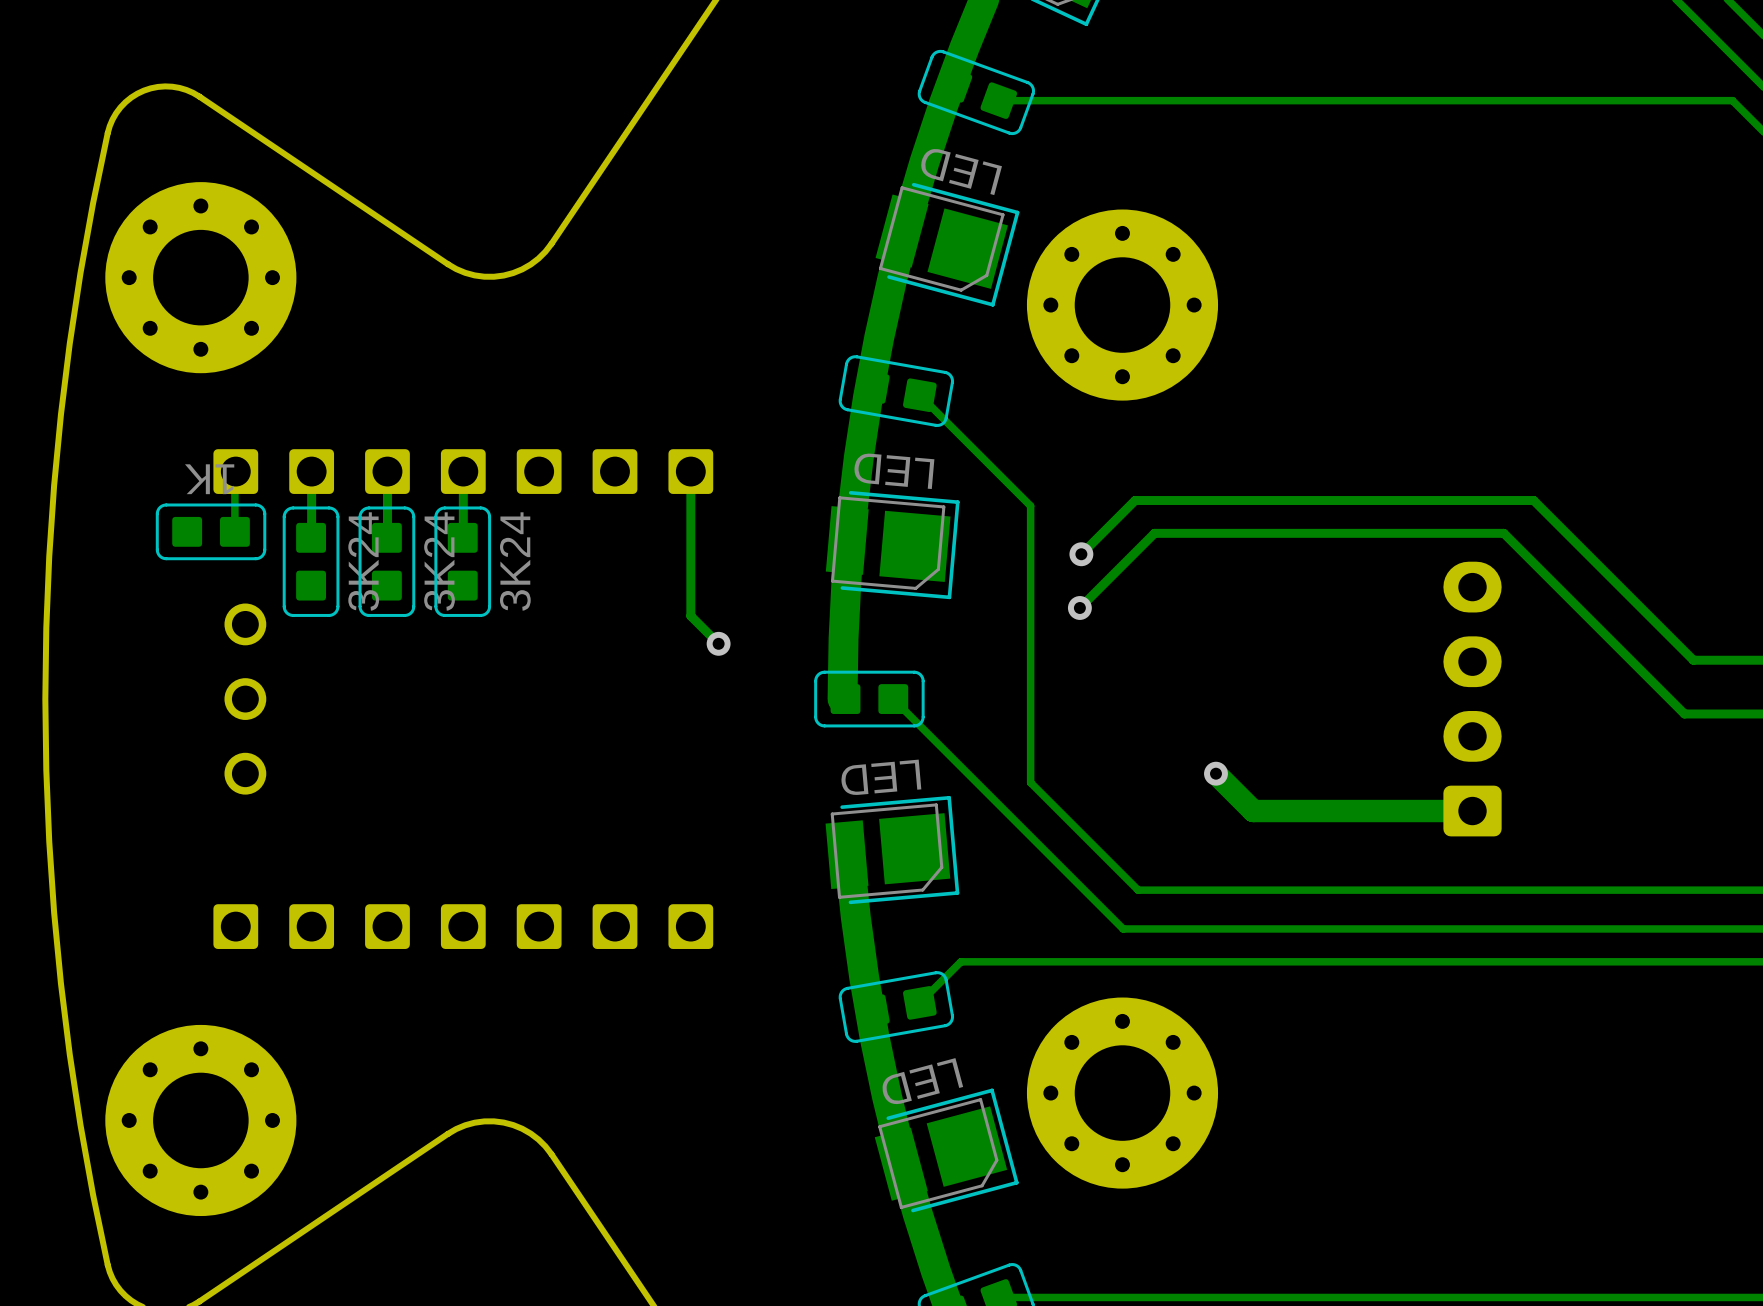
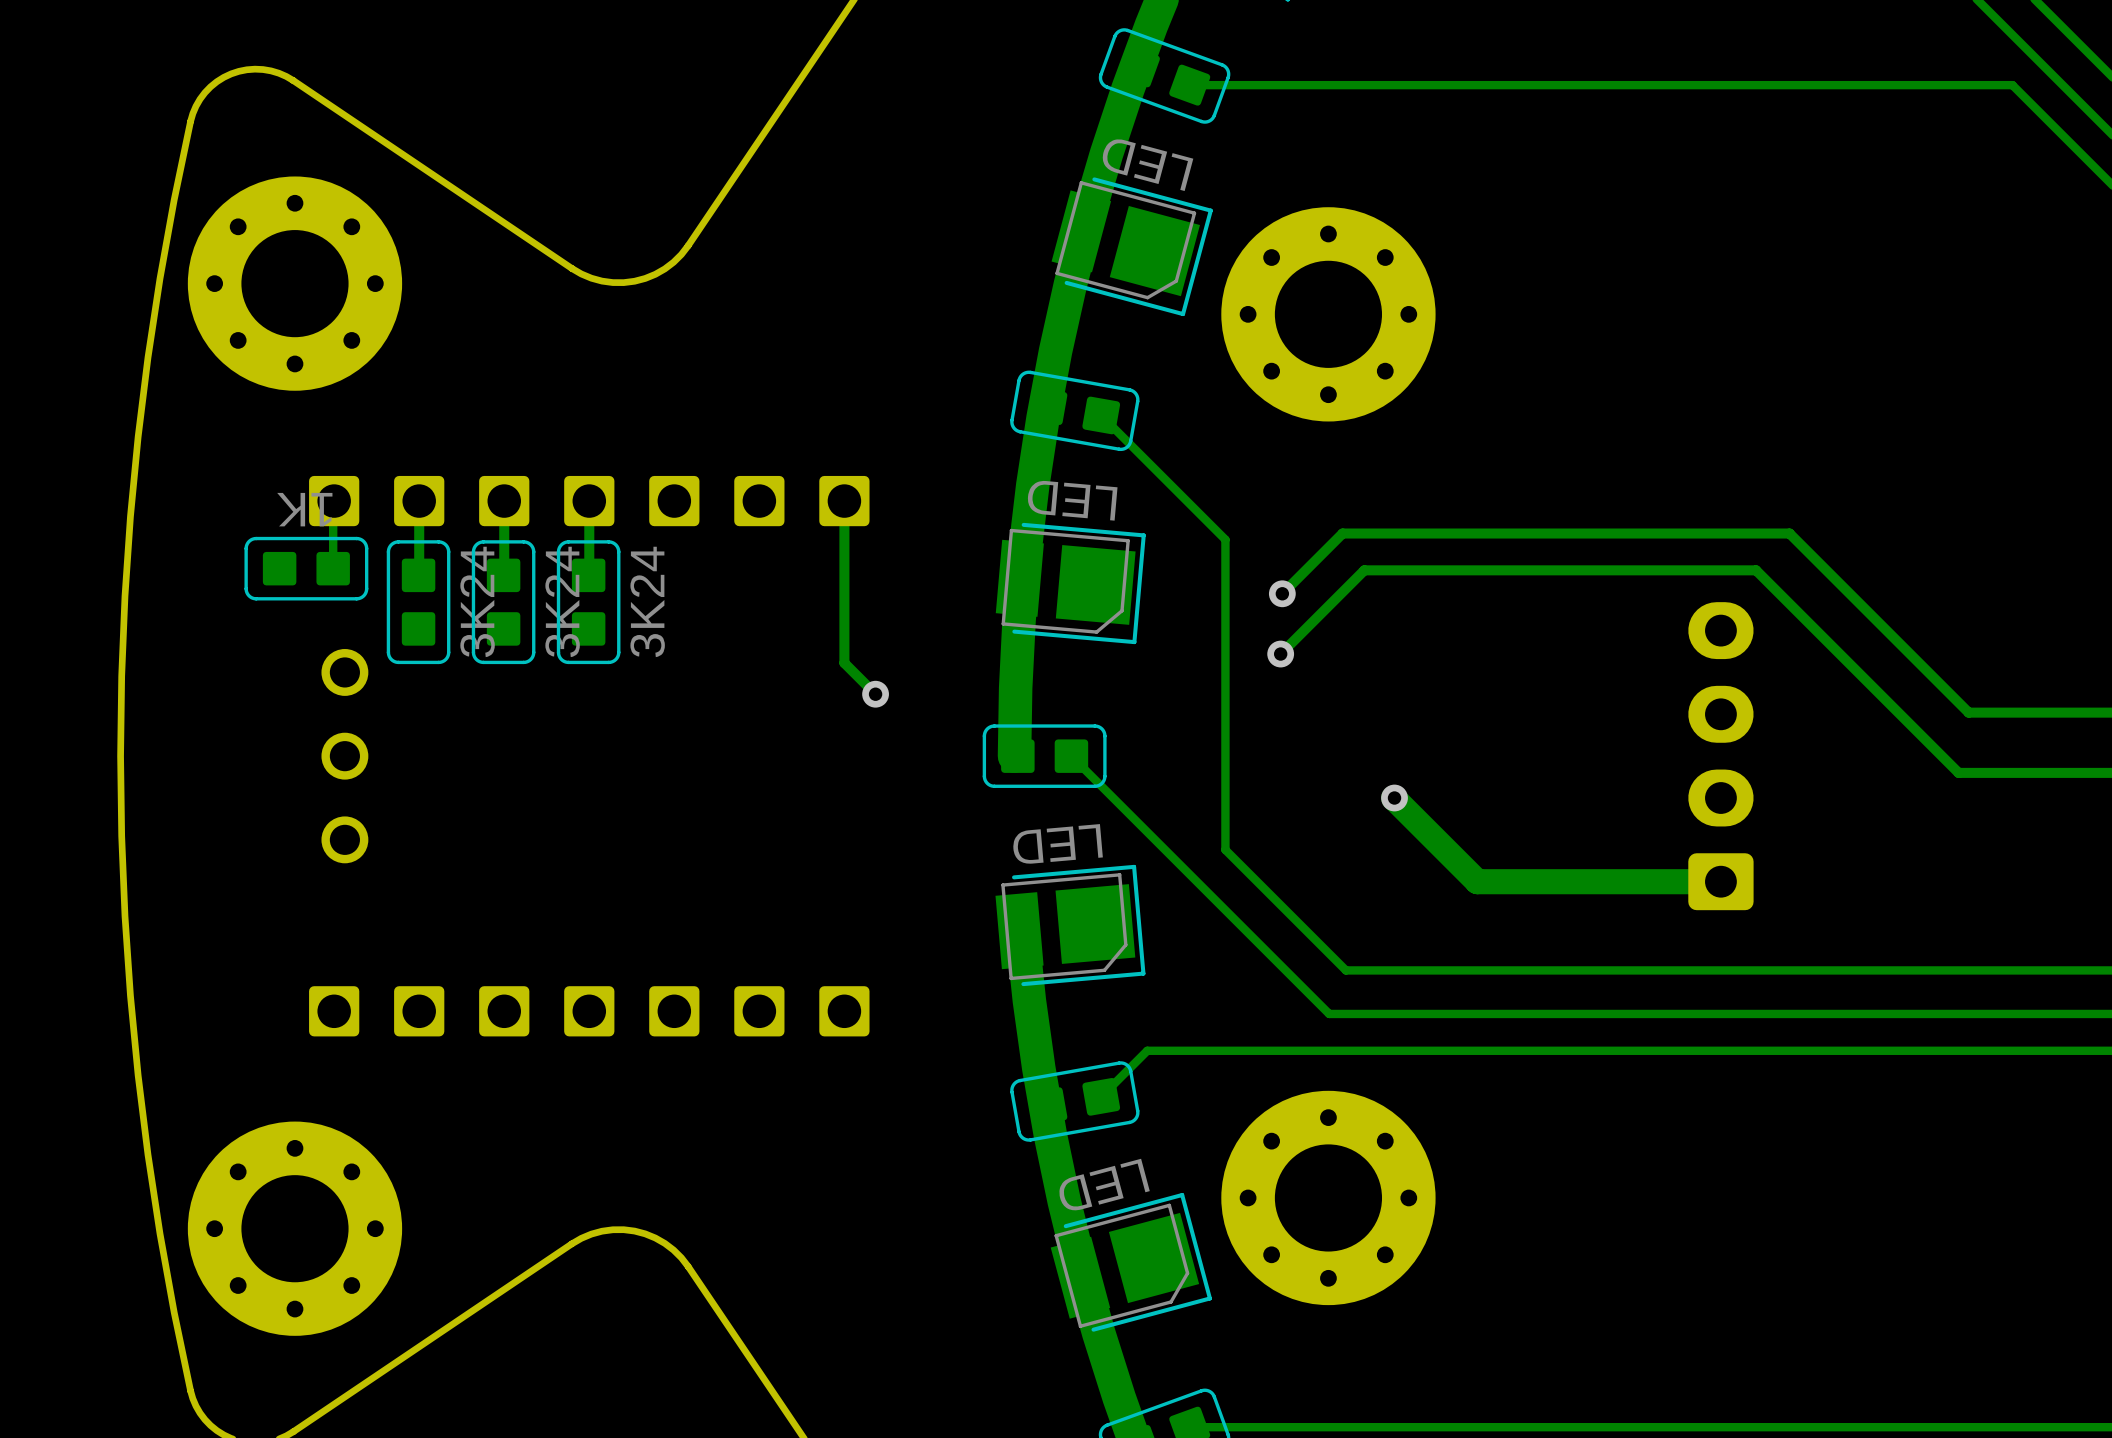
track: (1215, 773) (1255, 811) -> (1393, 798) (1477, 881)
via position: (1215, 773) -> (1394, 798)

